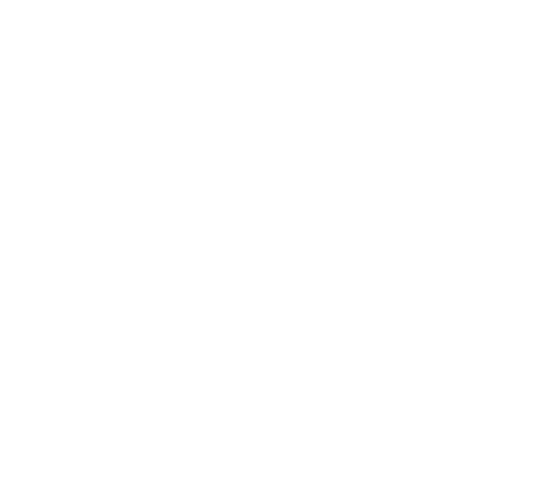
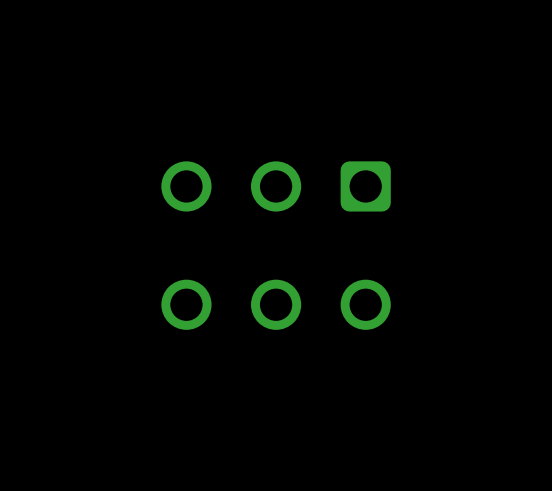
part: none -> (276, 245)

